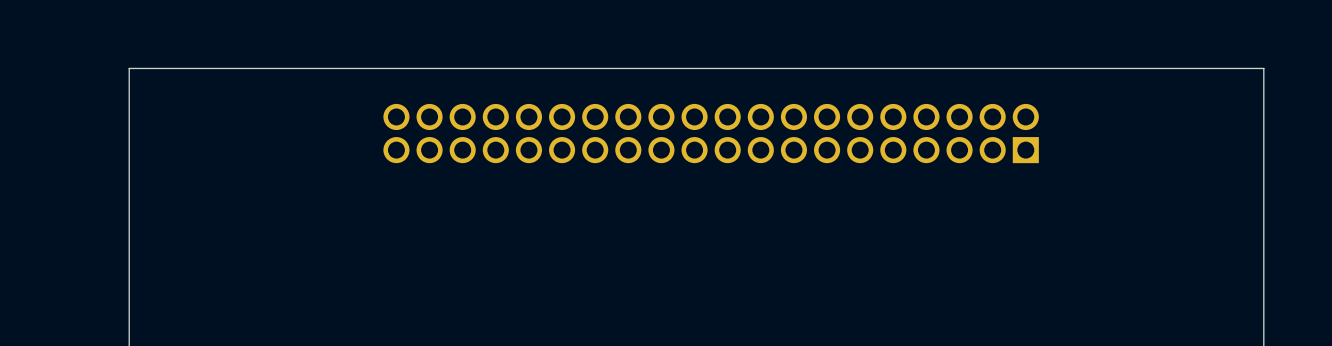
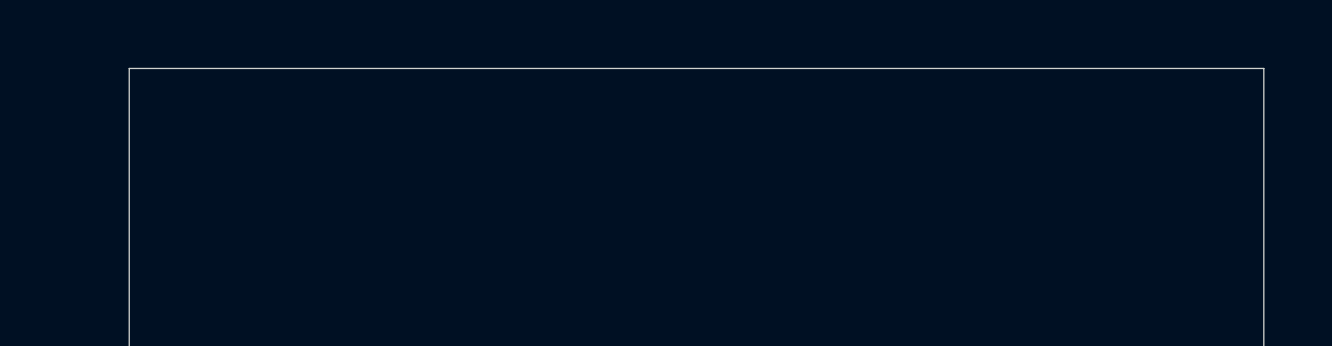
part: (711, 133) -> none

